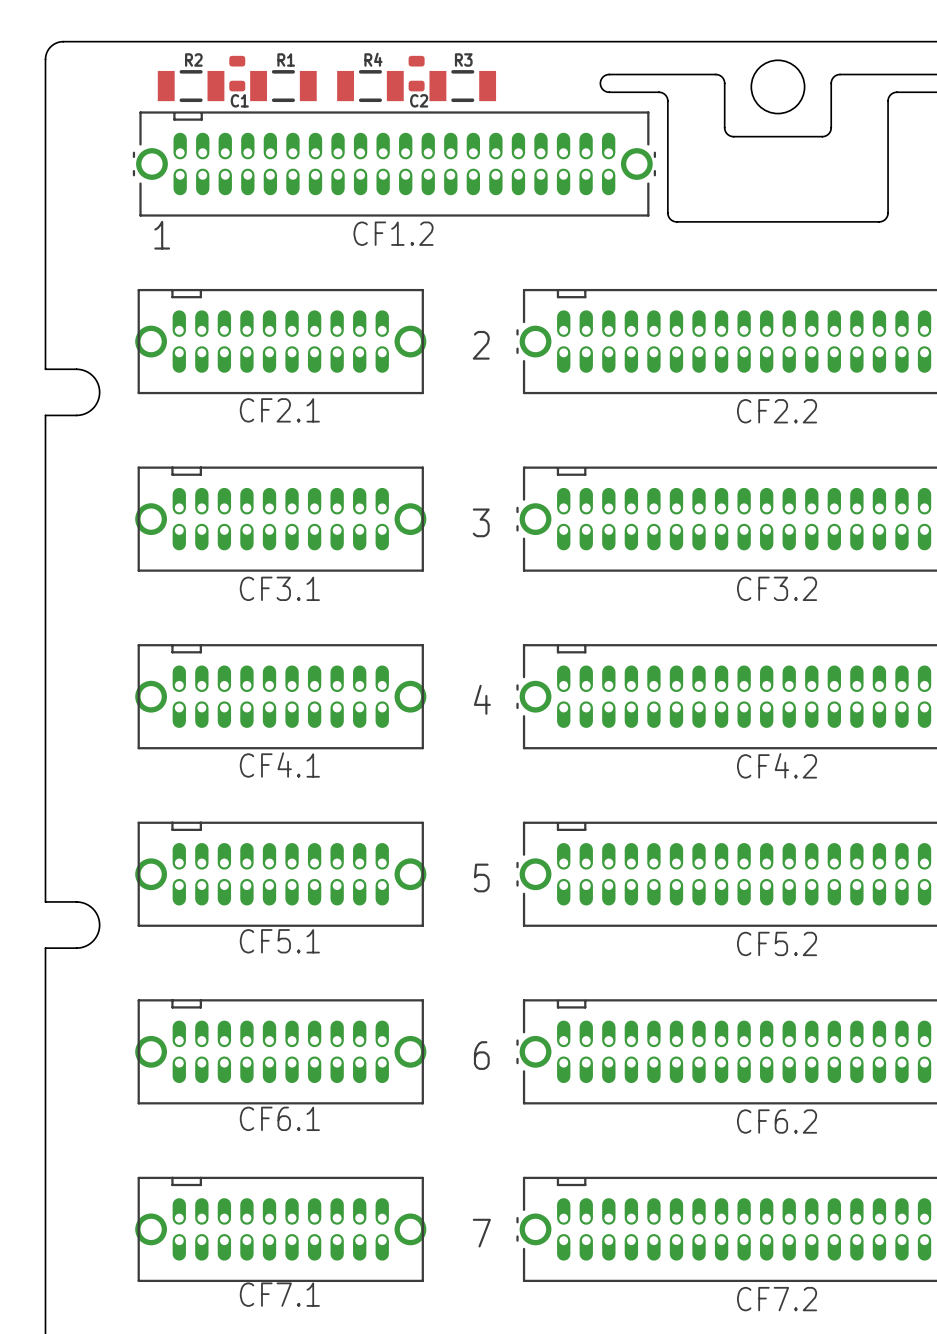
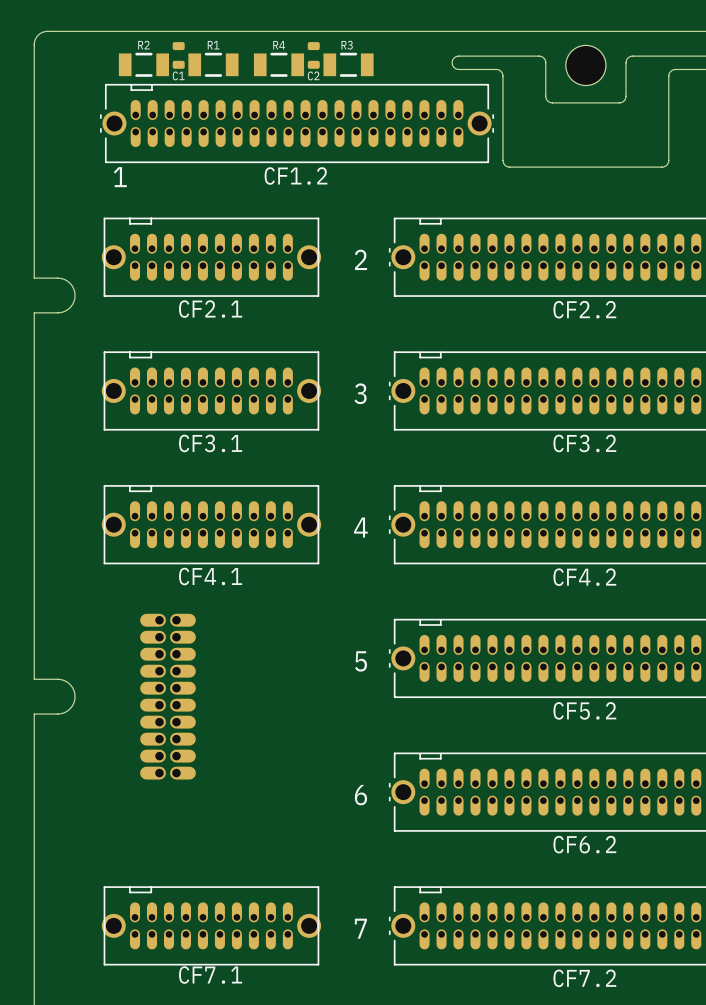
CF5.1: (280, 874) -> none
part: none -> (167, 696)
CF6.1: (280, 1051) -> none

